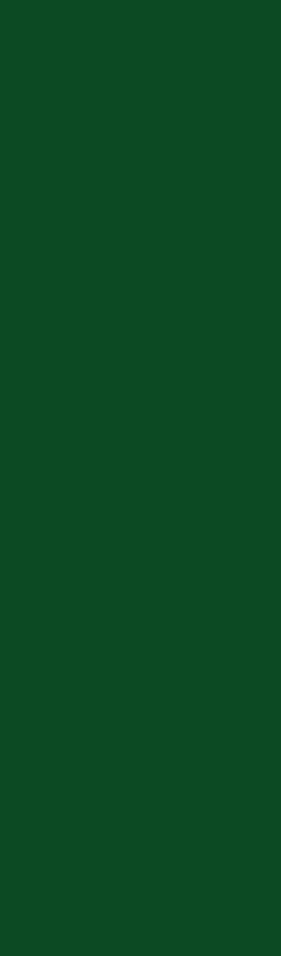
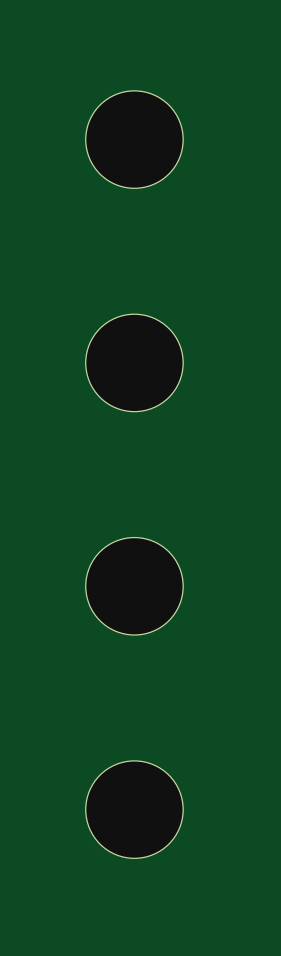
part: none -> (134, 139)
part: none -> (134, 362)
part: none -> (134, 586)
part: none -> (134, 809)

